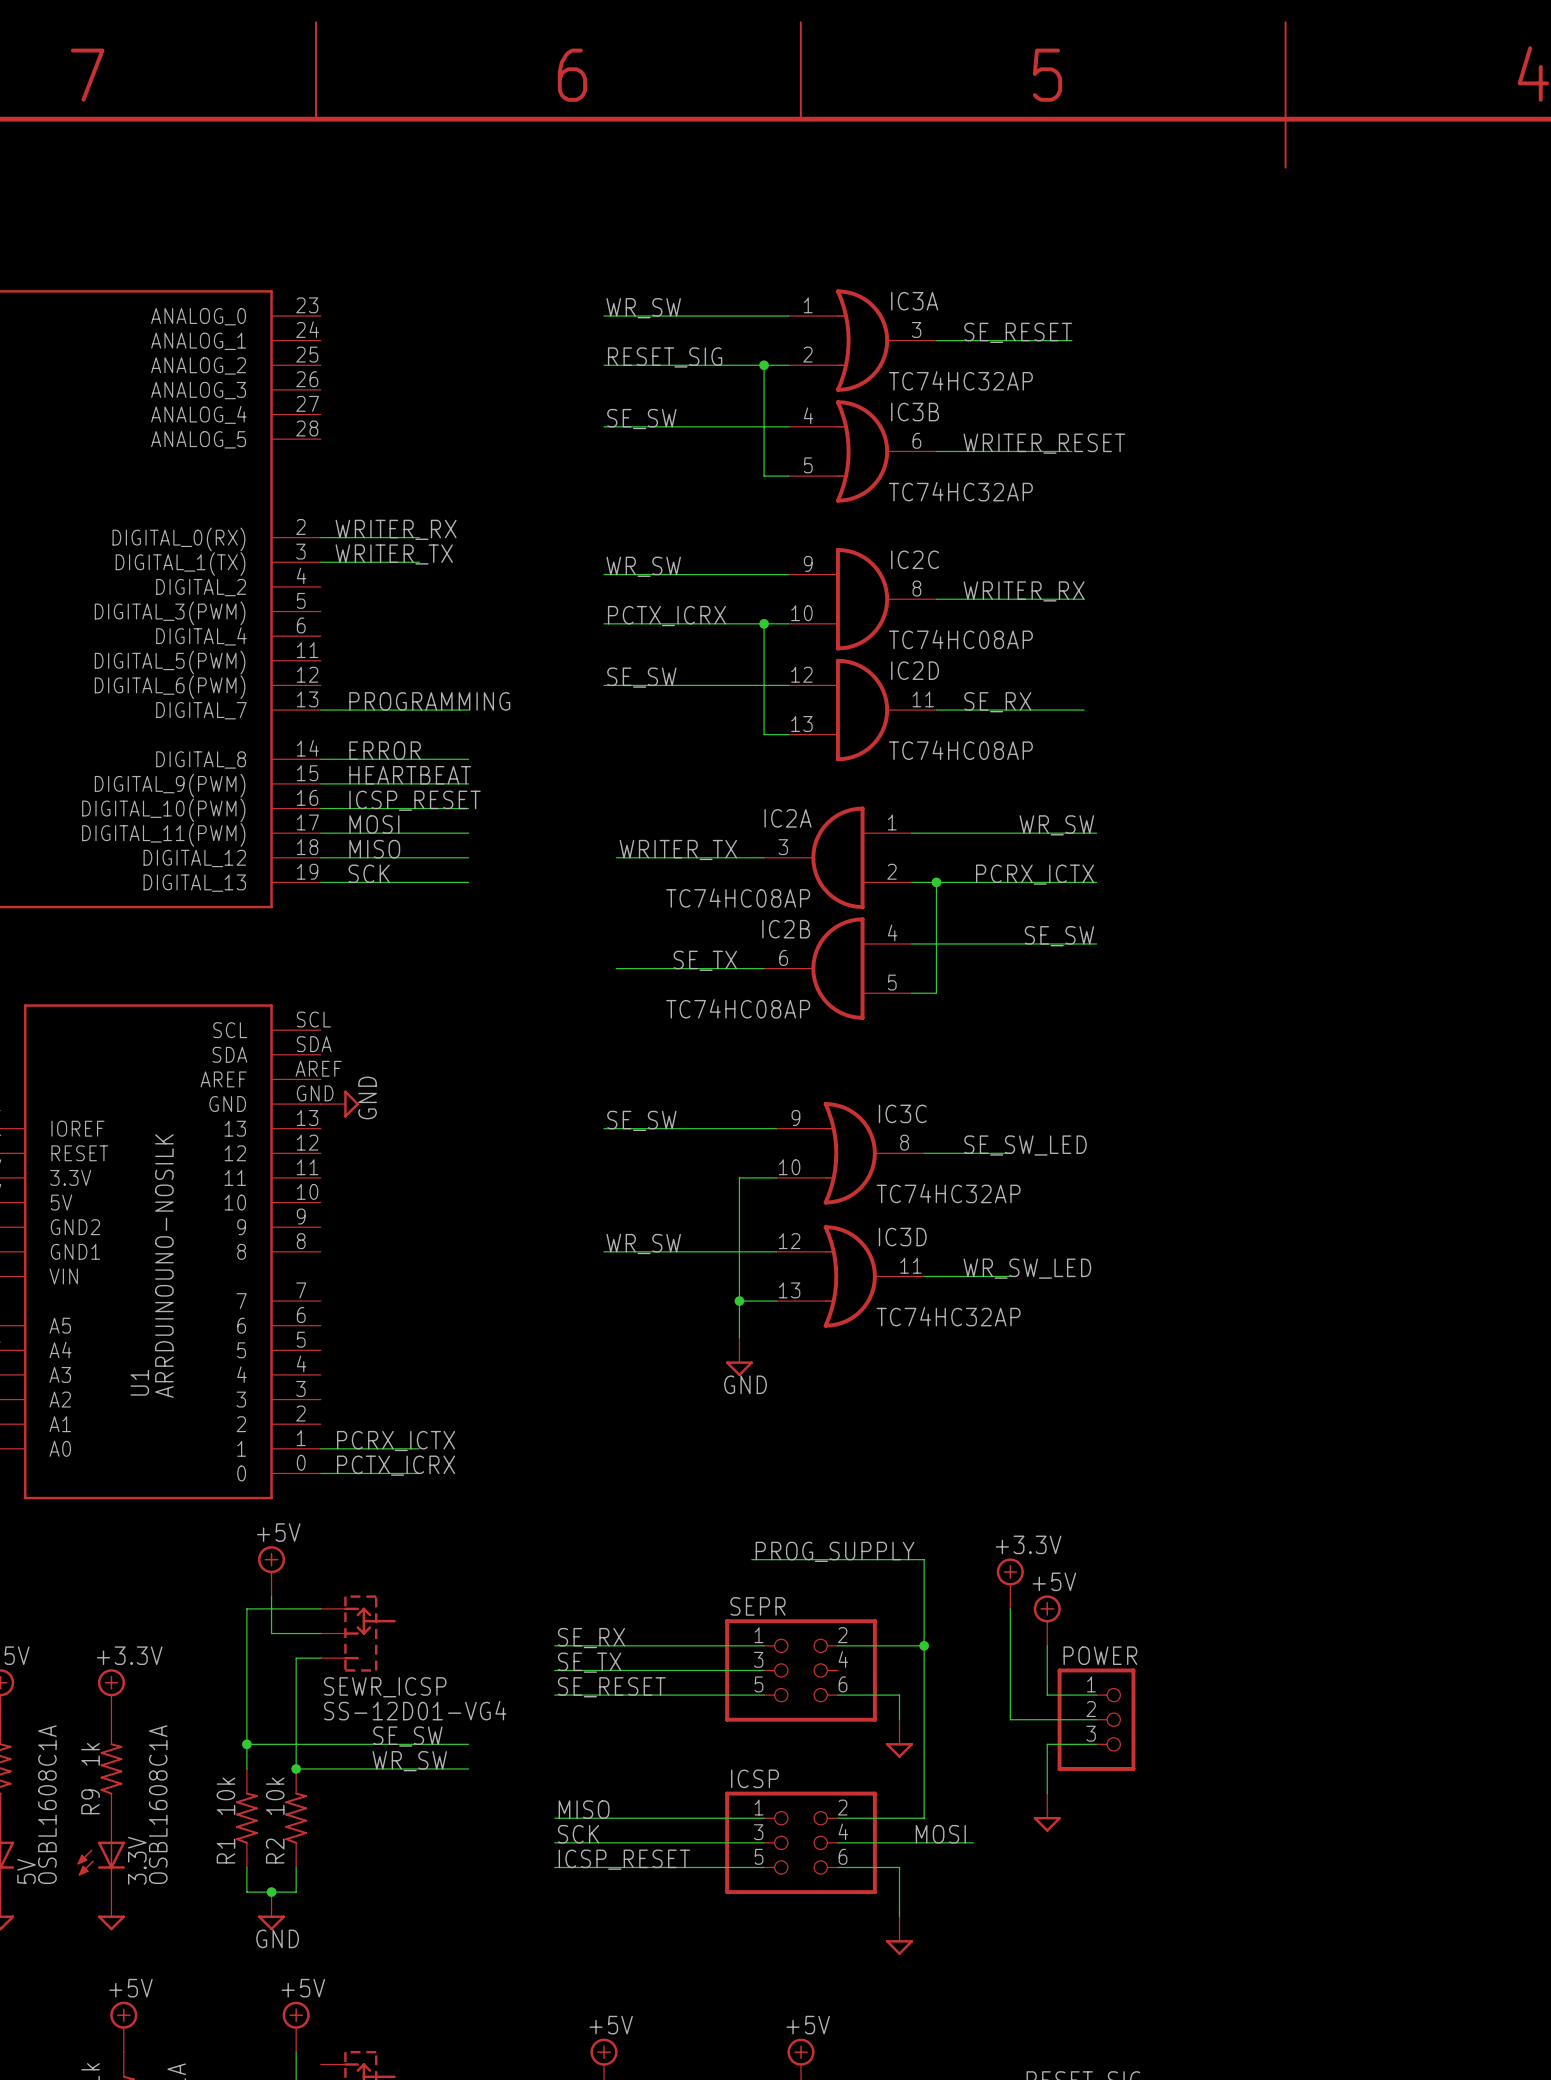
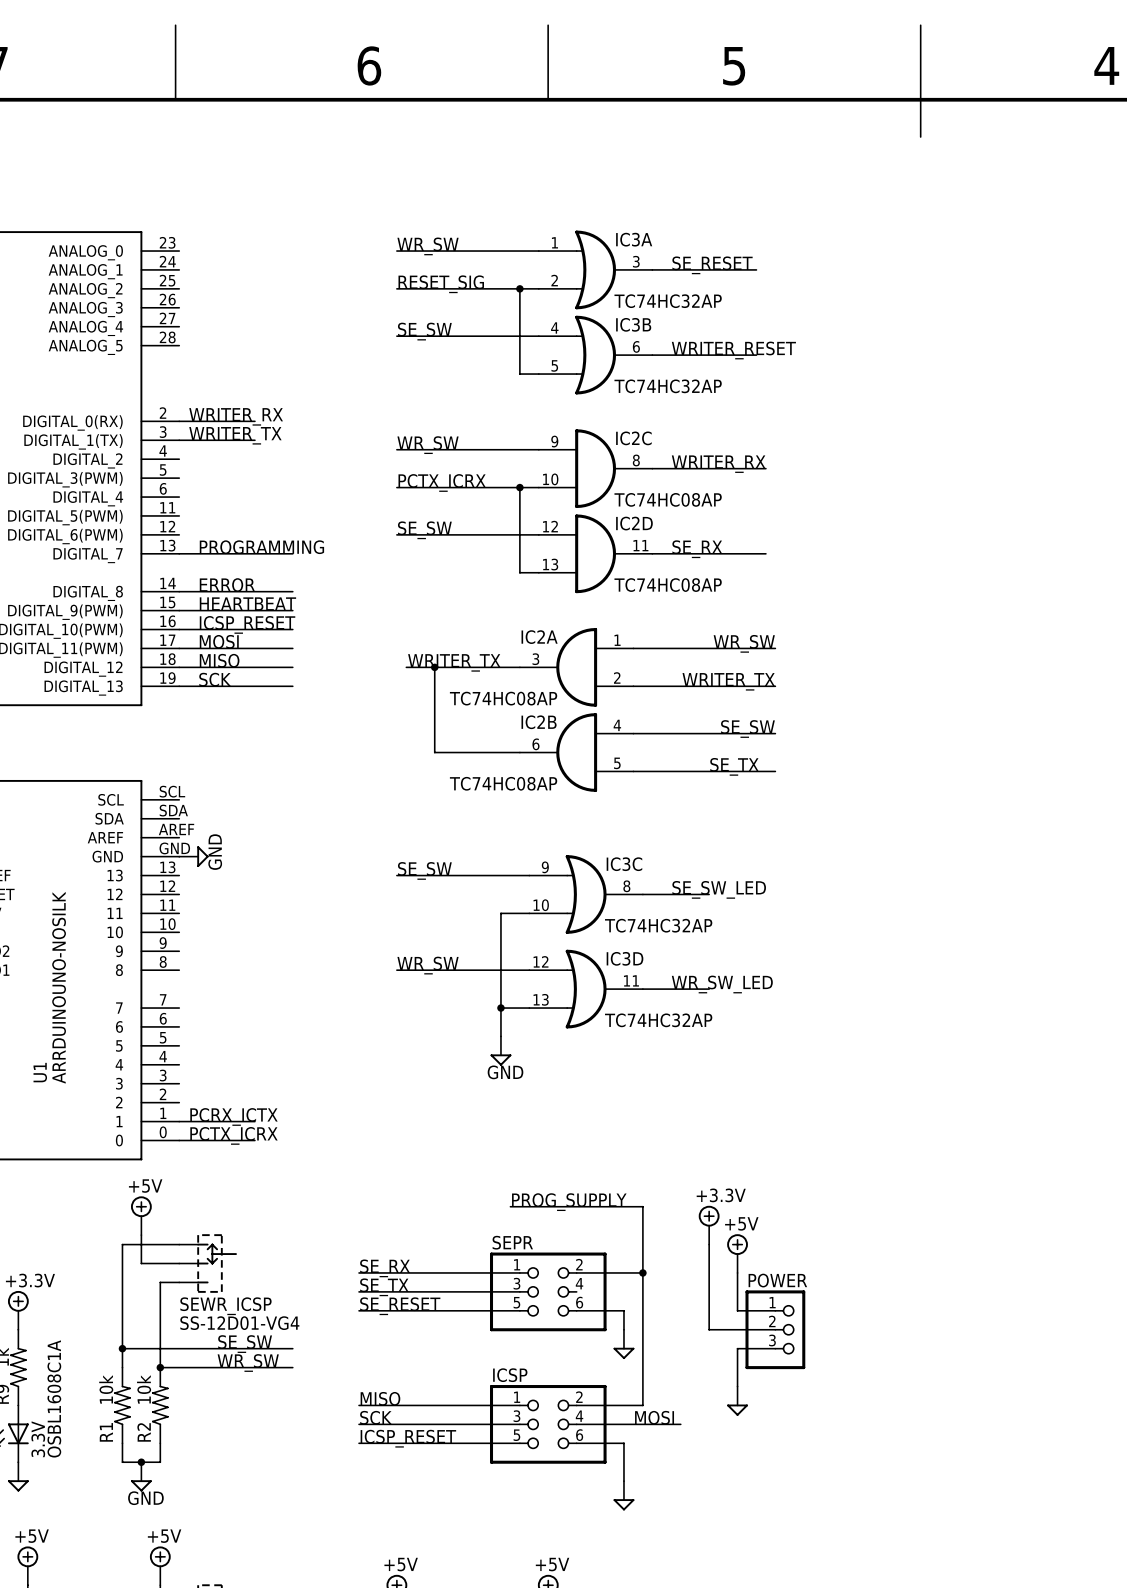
junction: none -> (434, 667)
label: PCRX_ICTX (1035, 874) -> WRITER_TX (728, 681)
wire: (936, 882) (936, 993) -> (775, 771) (652, 771)
junction: (936, 882) -> none
label: SE_TX (705, 960) -> none
wire: (616, 968) (653, 968) -> (434, 667) (434, 752)
label: none -> SE_TX (734, 766)

